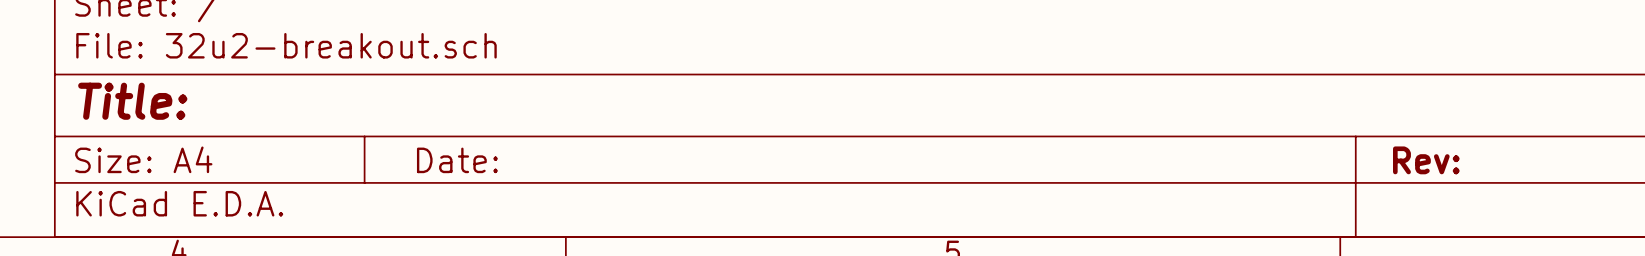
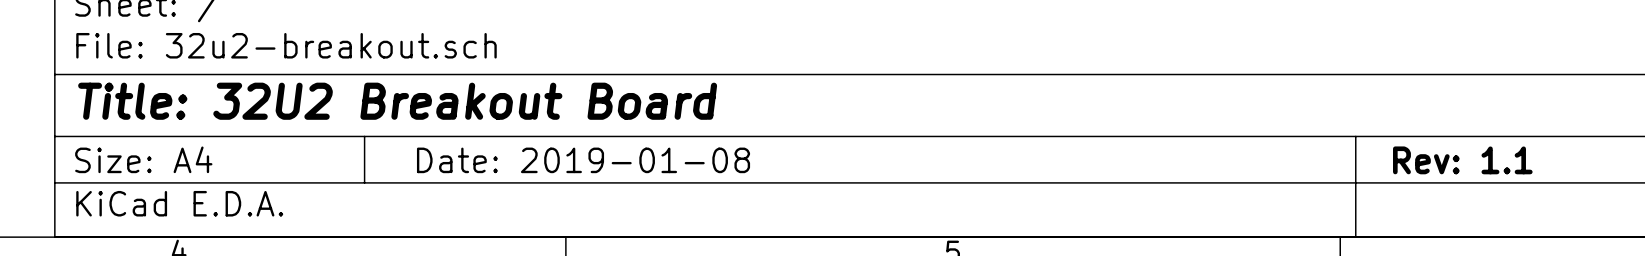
title block: Title: (132, 101) -> Title: 32U2 Breakout Board (397, 101)
title block: Date: (457, 160) -> Date: 2019-01-08 (583, 160)
title block: Rev: (1426, 160) -> Rev: 1.1 (1462, 160)

